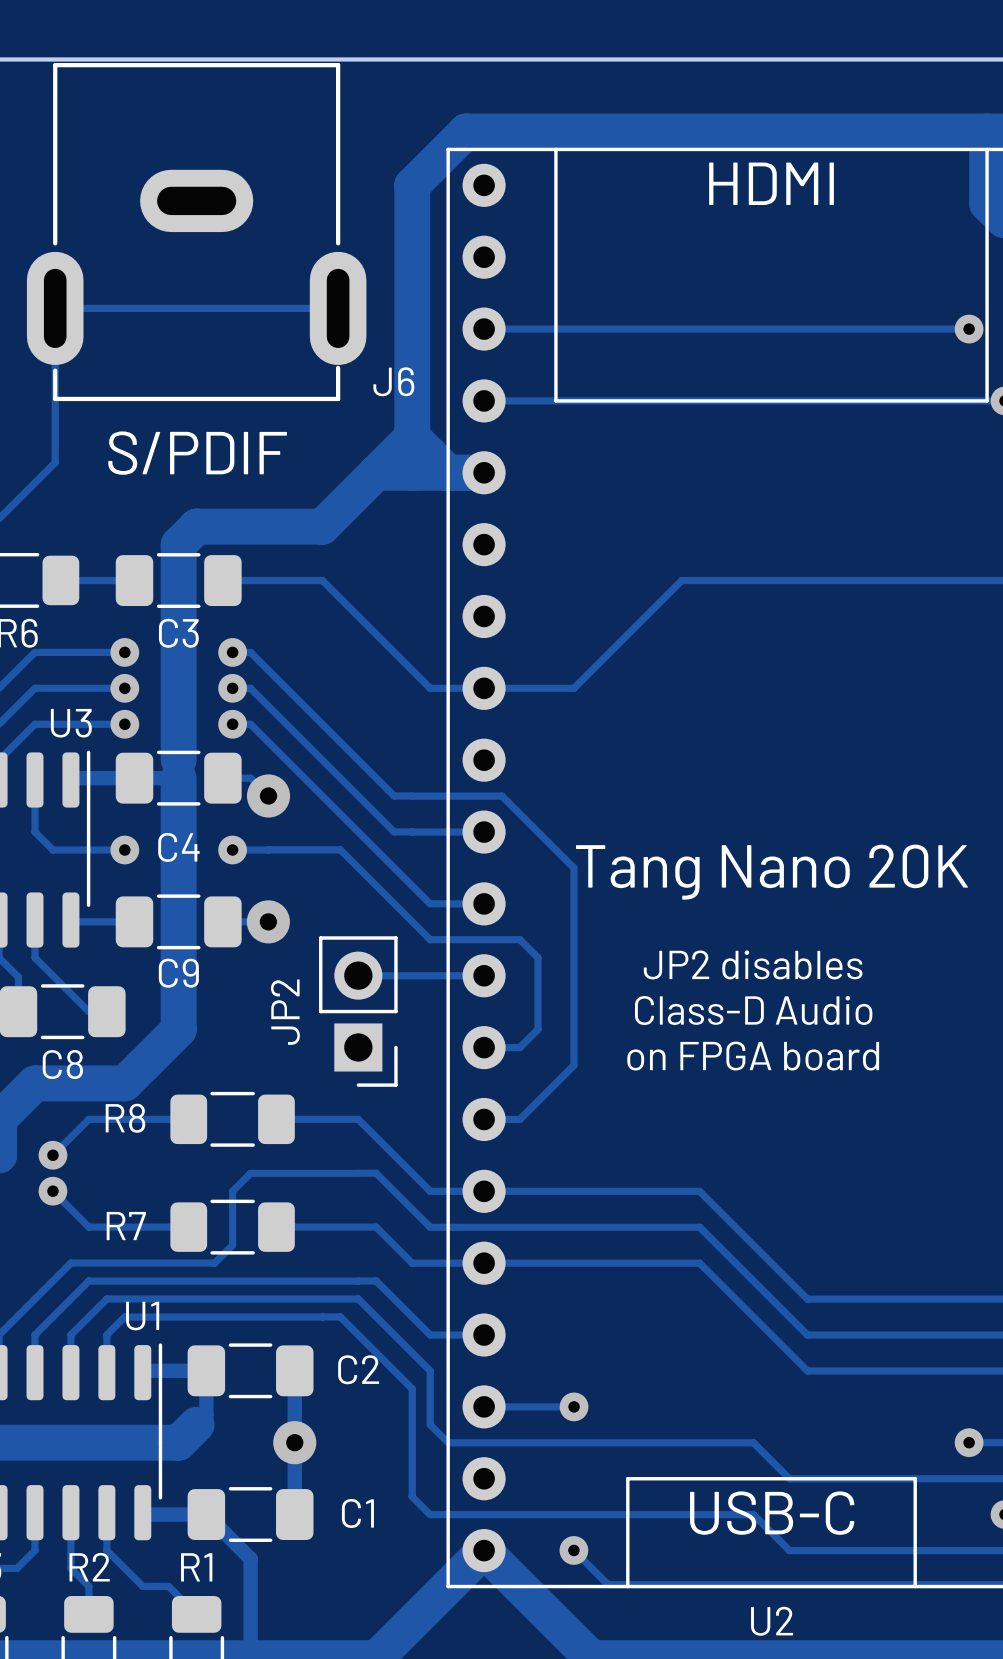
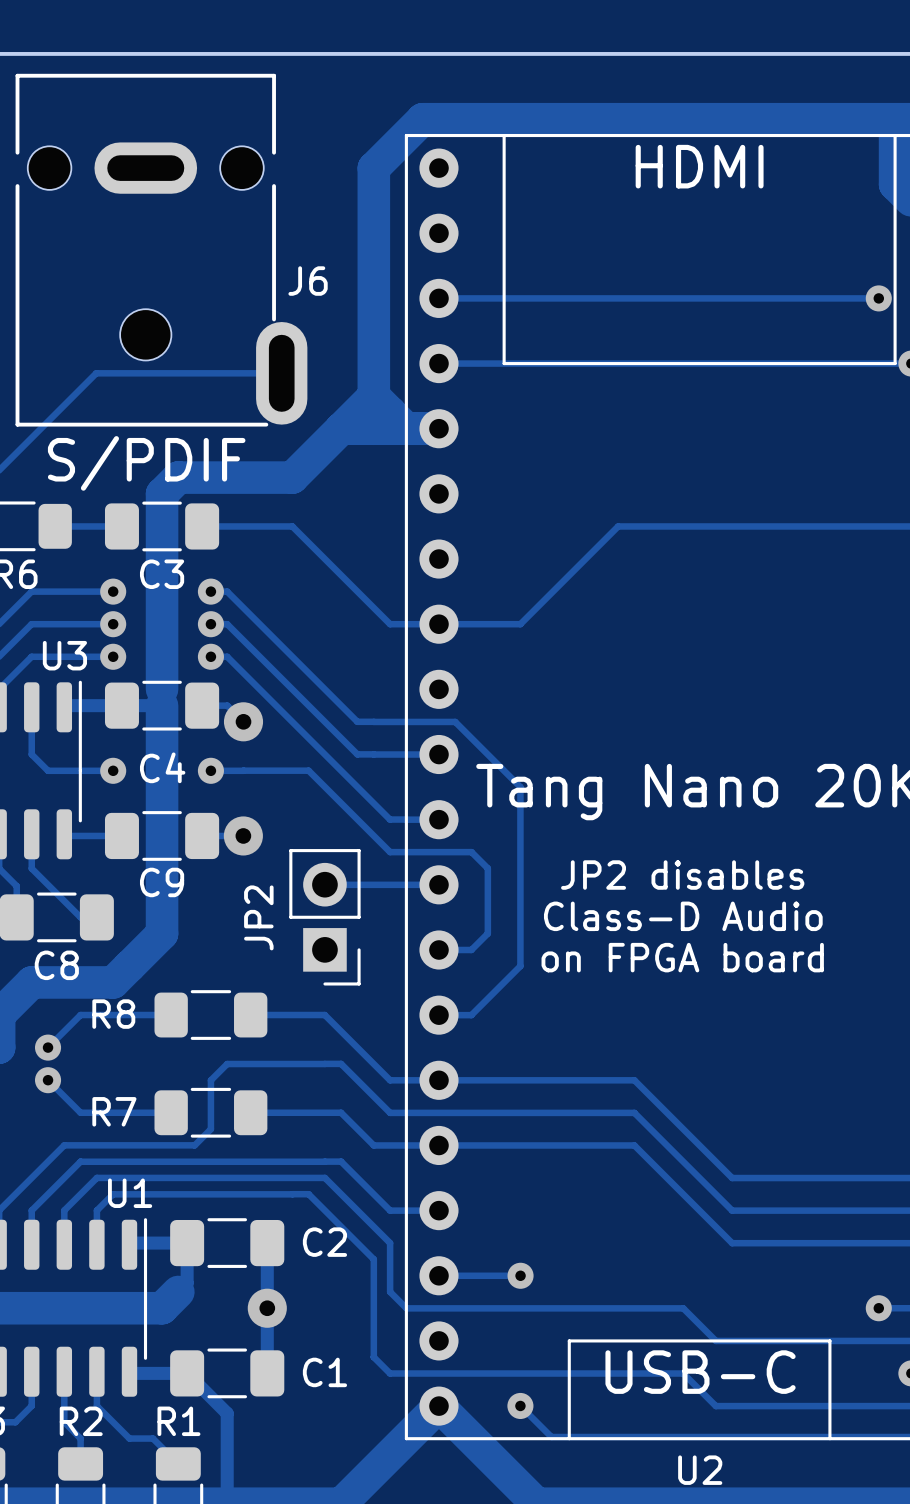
J6 footprint: [26, 63, 367, 402] -> [15, 73, 308, 427]
track: (338, 308) (55, 308) (55, 462) -> (281, 373) (96, 373) (50, 419)
J6 name position: J6 (393, 381) -> J6 (308, 281)
text position: S/PDIF (197, 453) -> S/PDIF (146, 463)

